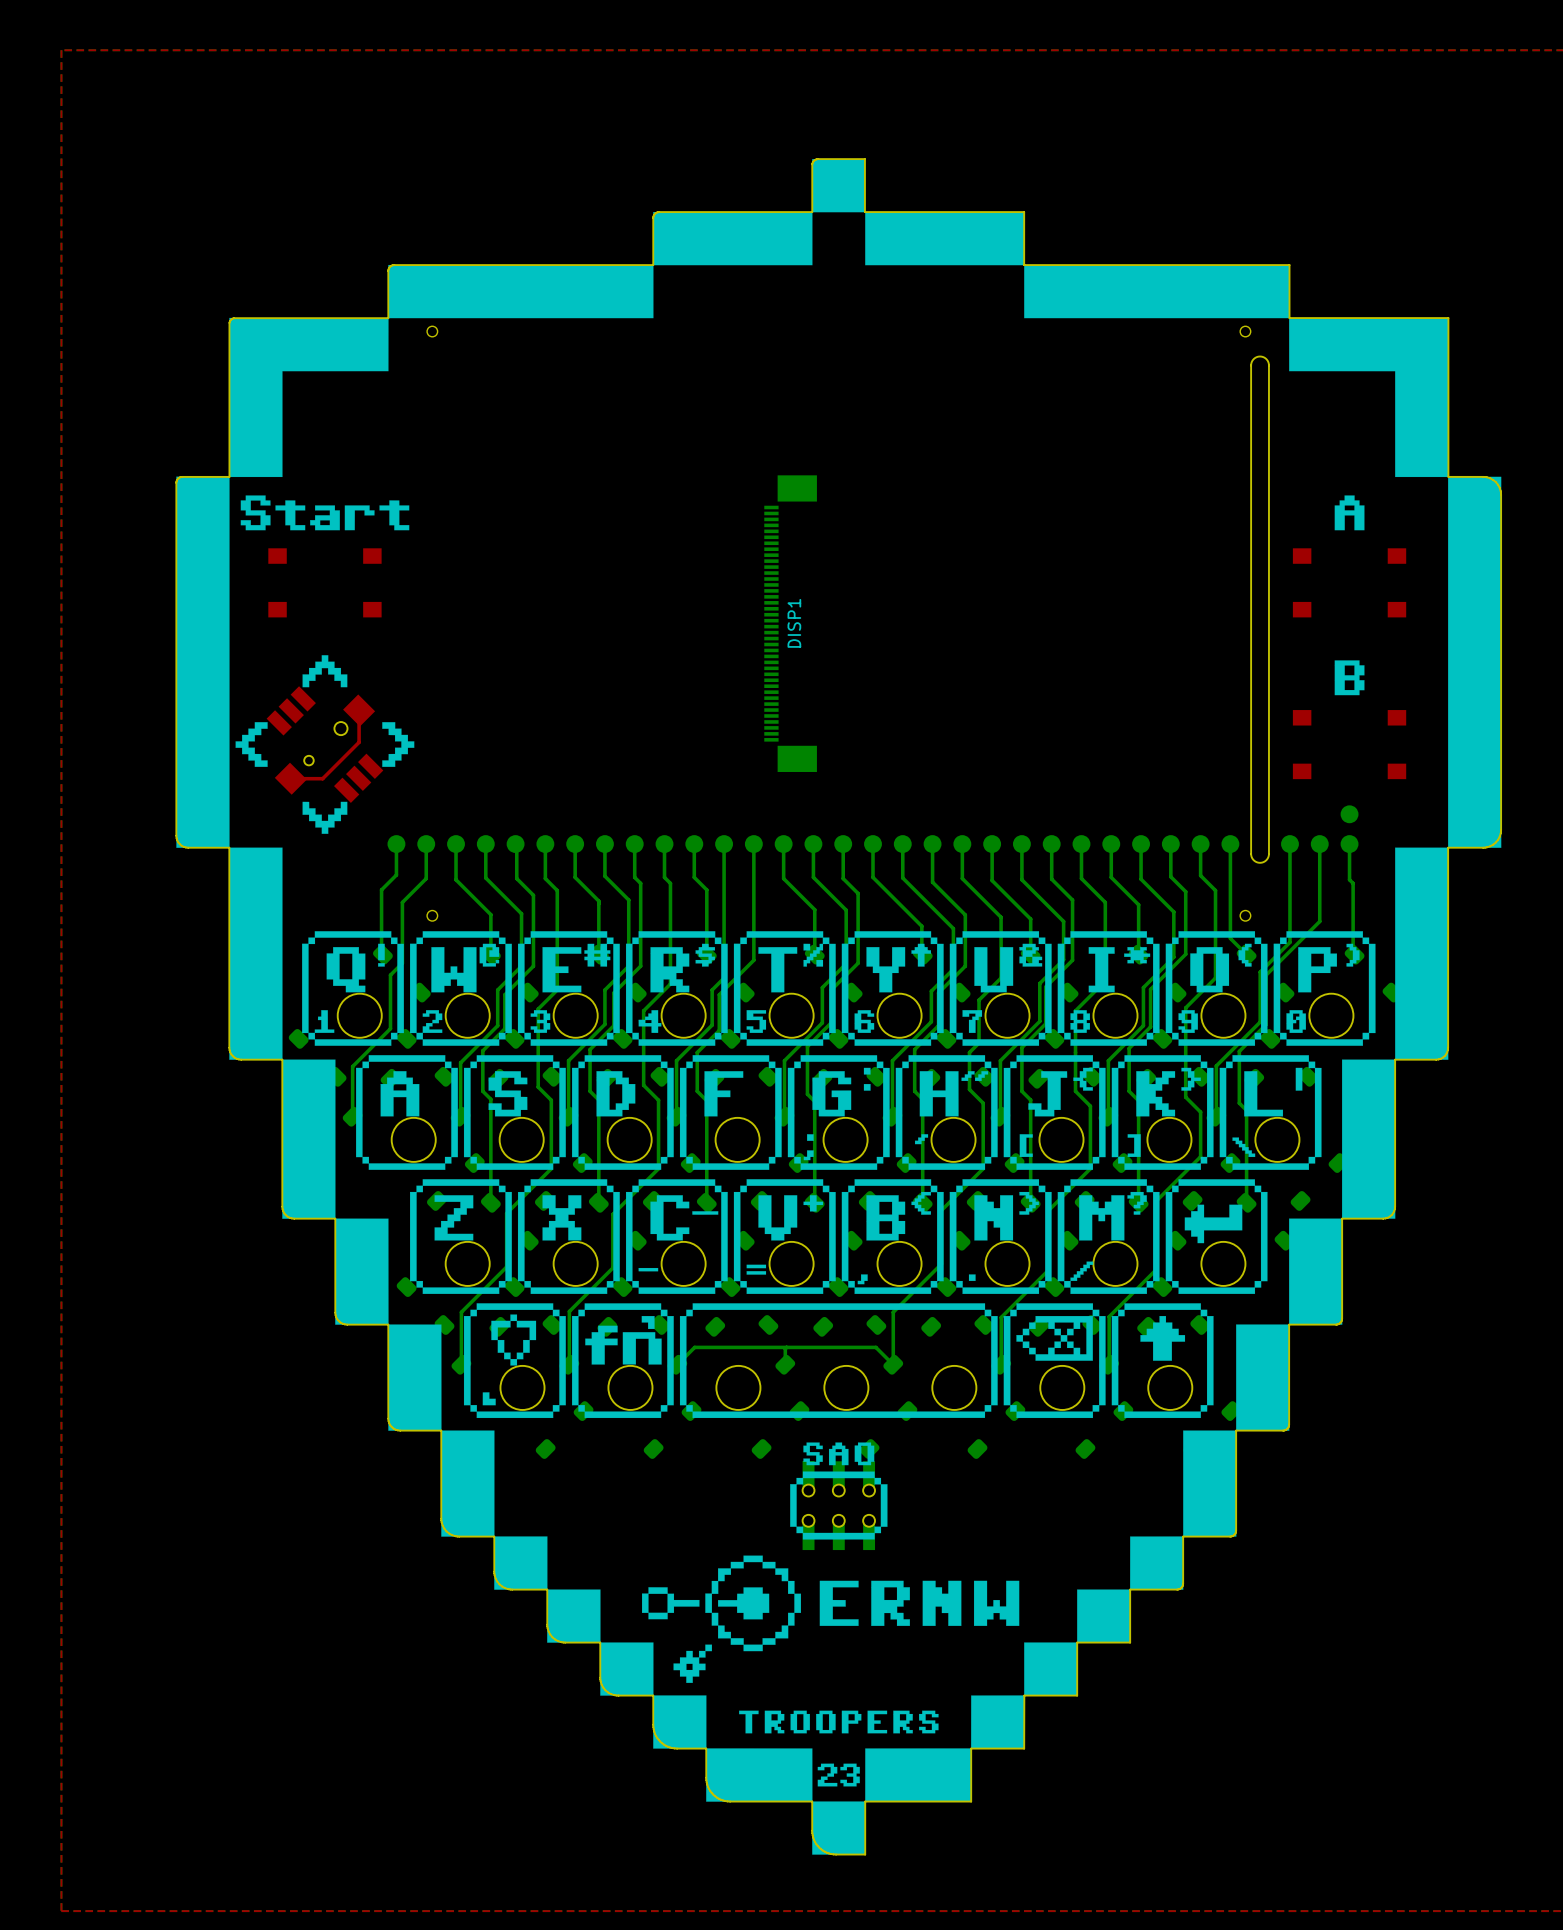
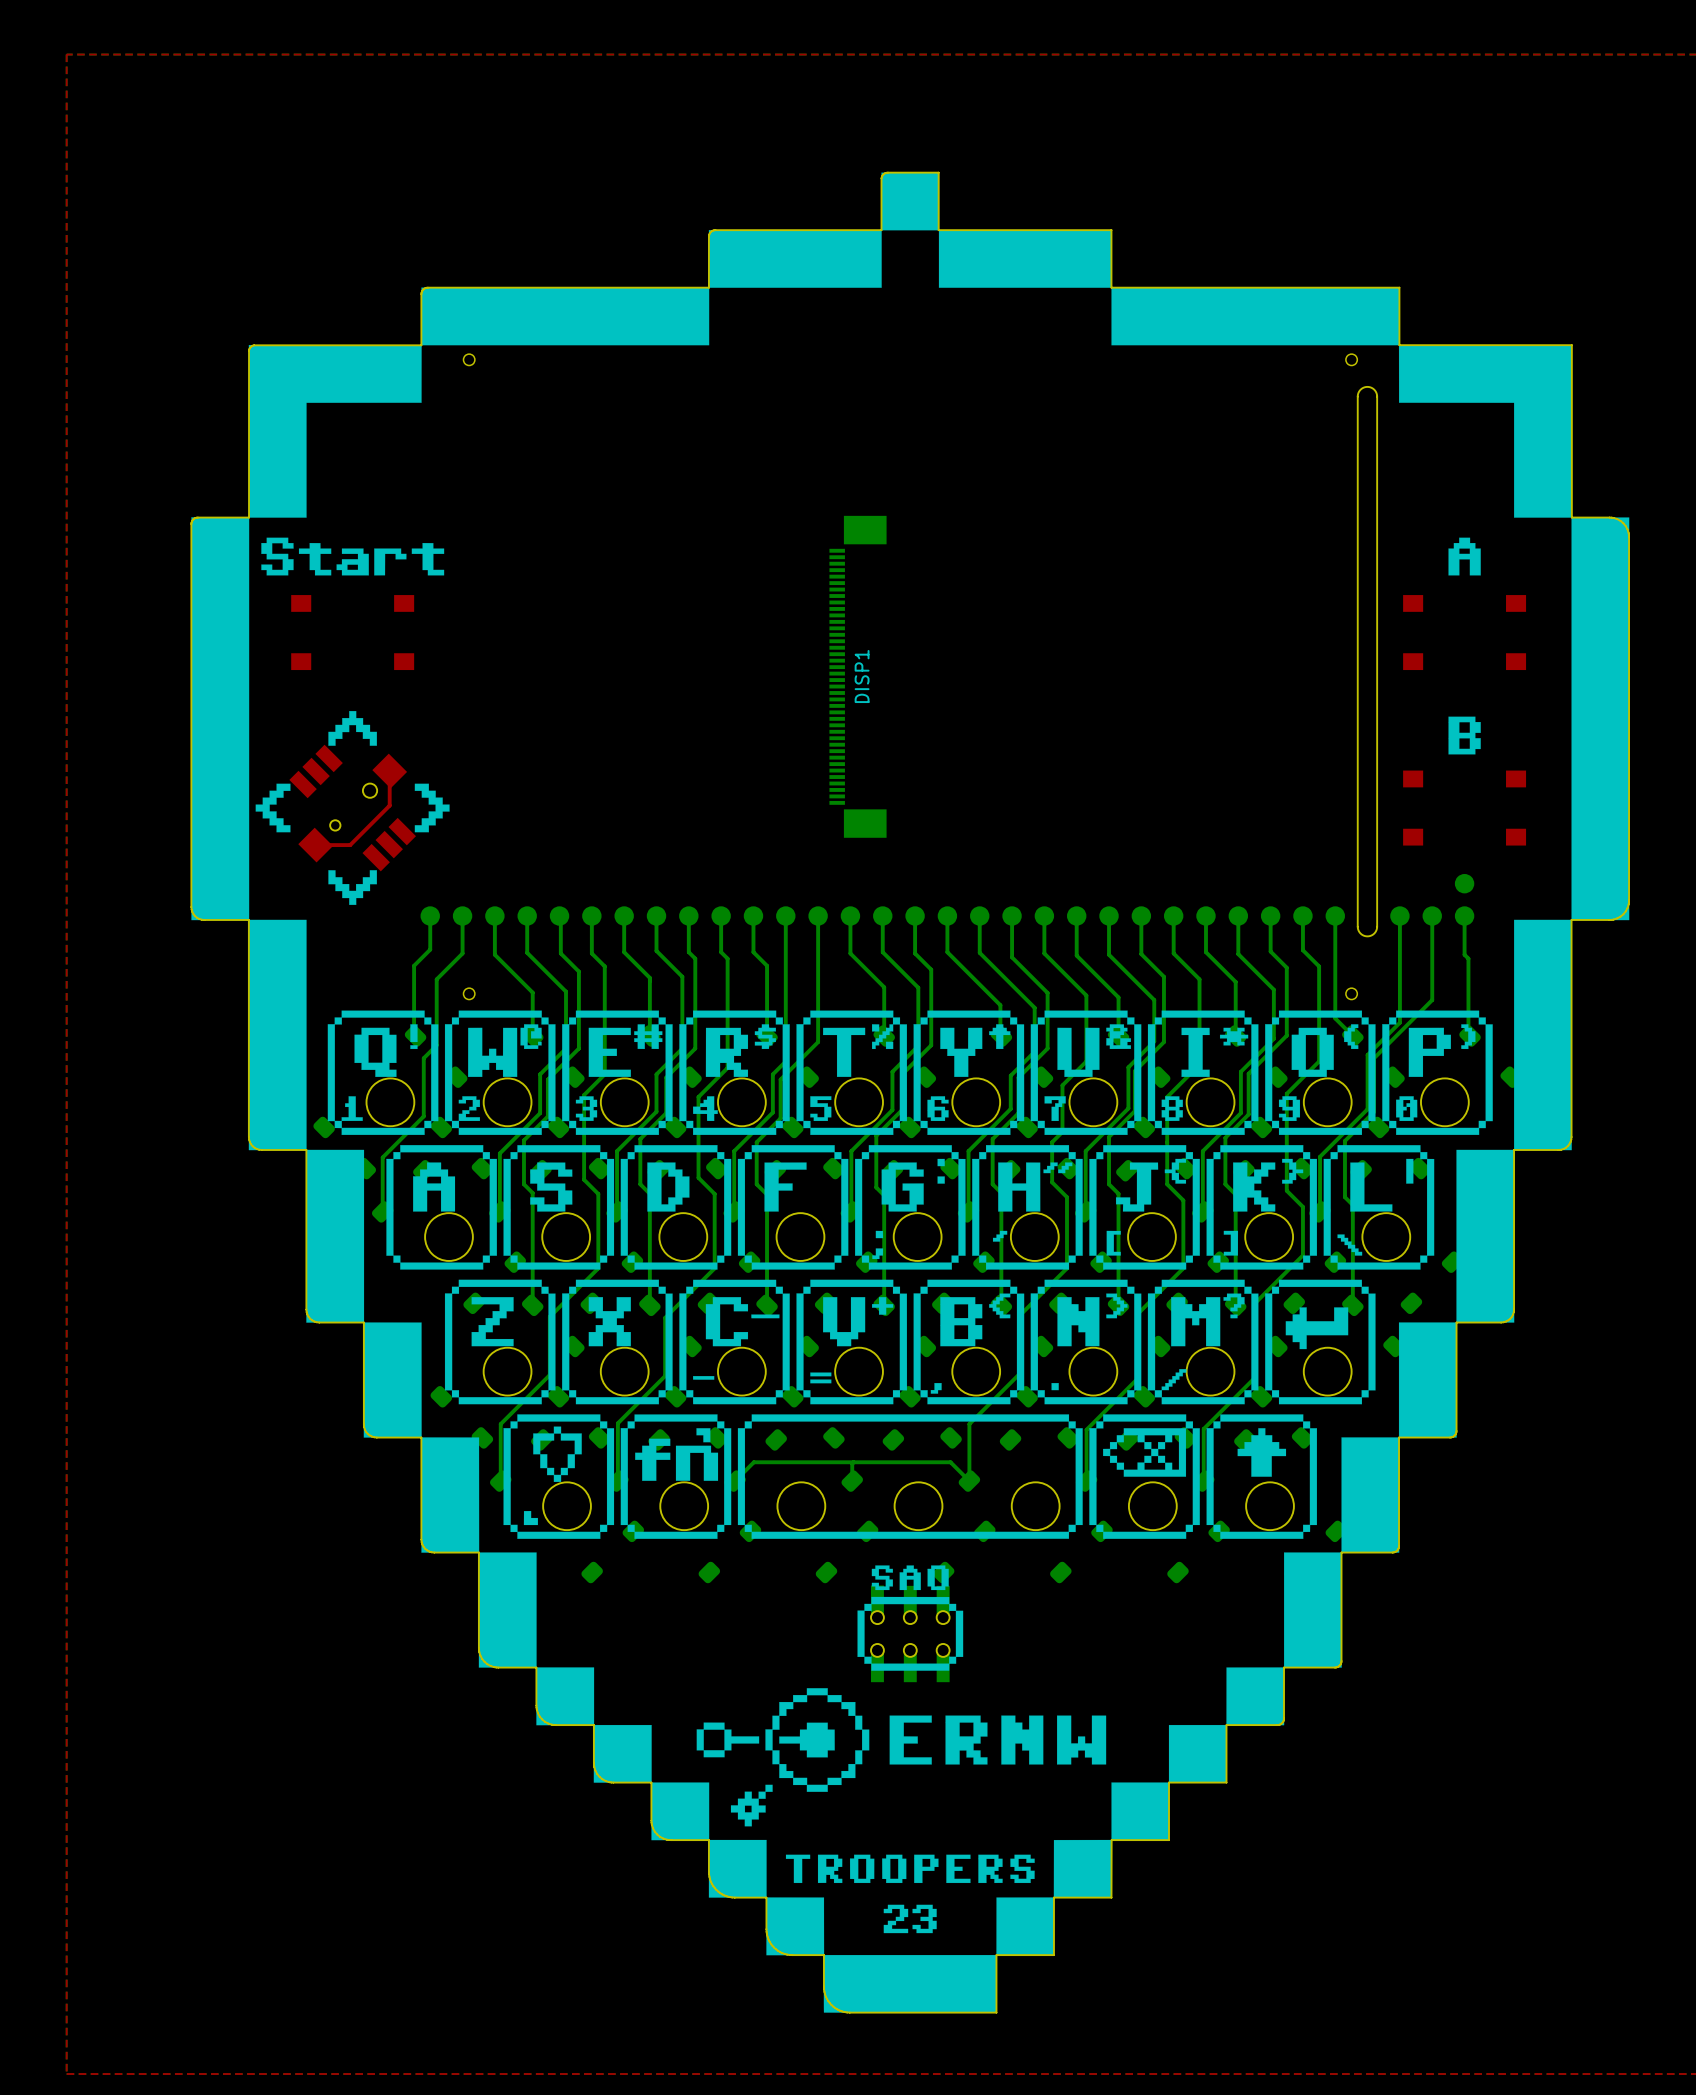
drawing shape: [175, 158, 1502, 1856] -> [190, 172, 1630, 2014]

